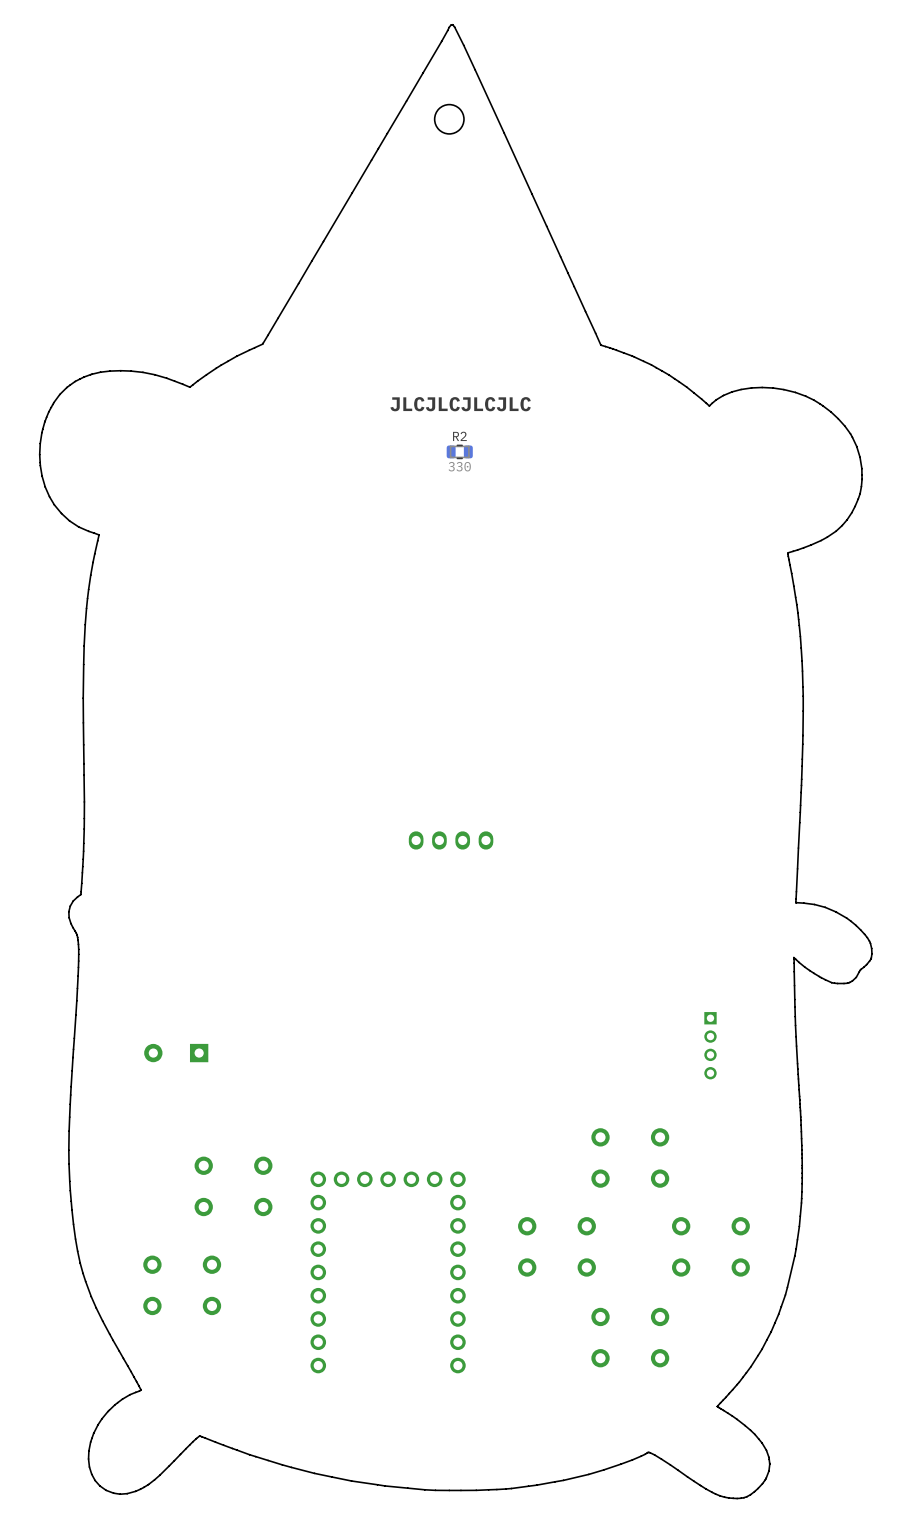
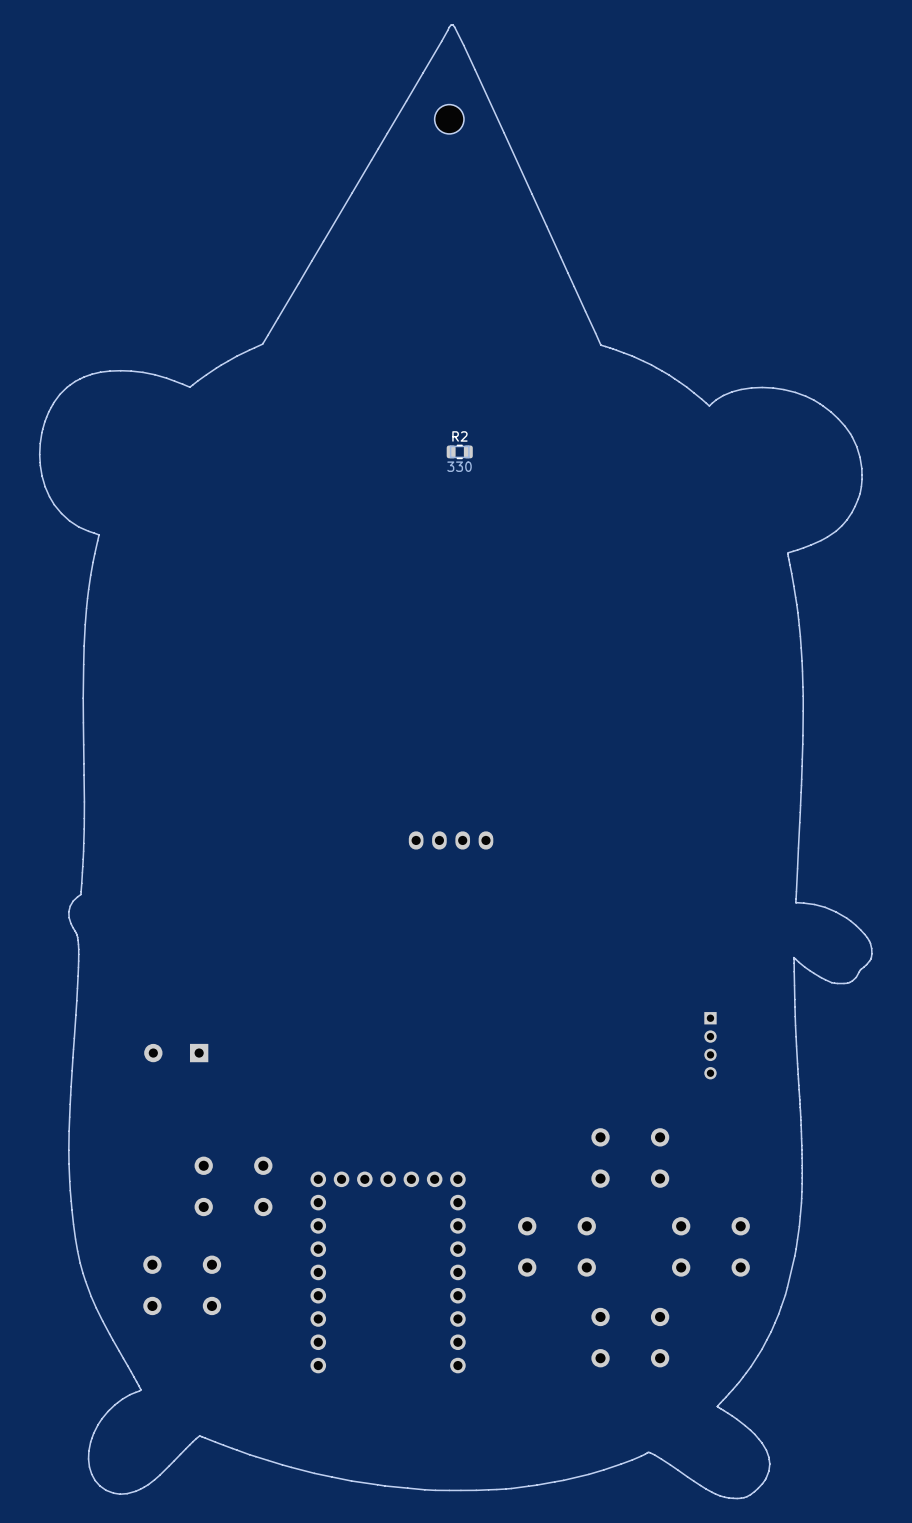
text: JLCJLCJLCJLC (460, 404) -> none

